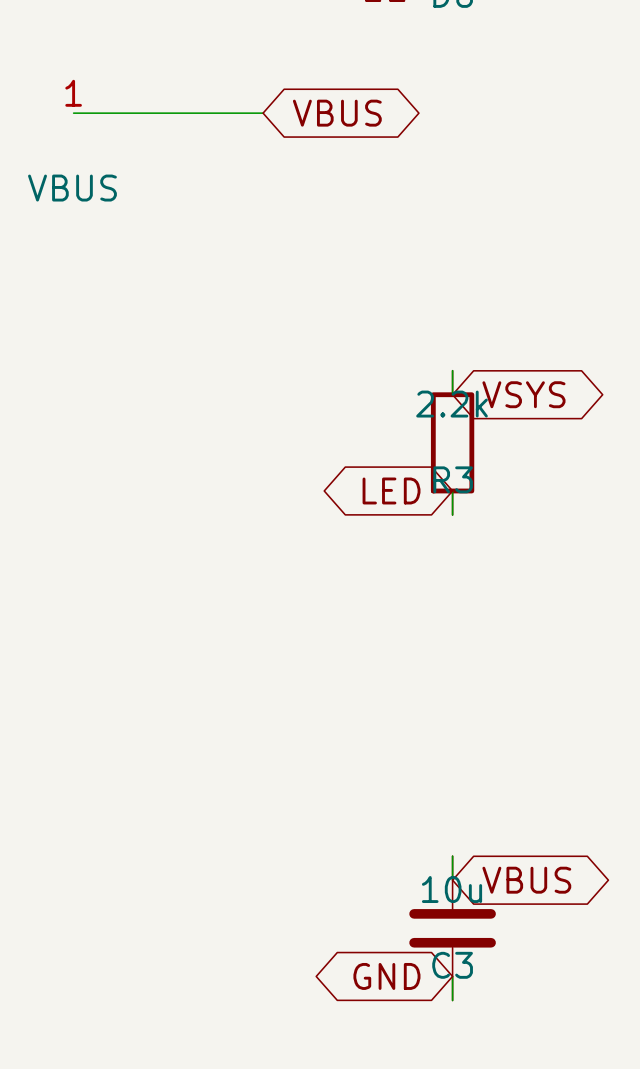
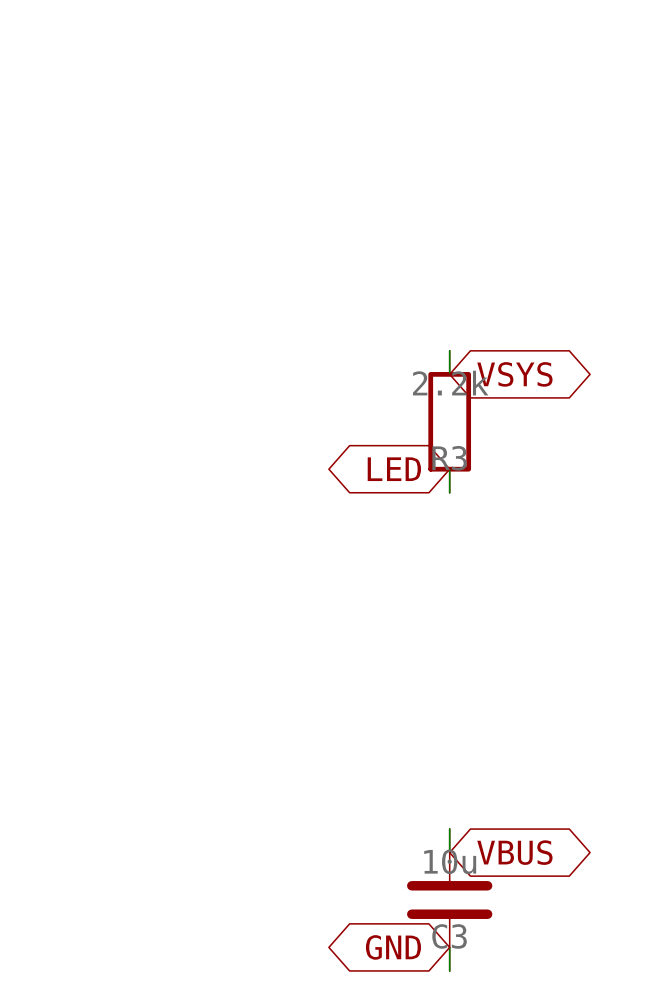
wire: (73, 113) (263, 113) -> none
global label: VBUS (337, 113) -> none
power symbol: VBUS (72, 140) -> none

